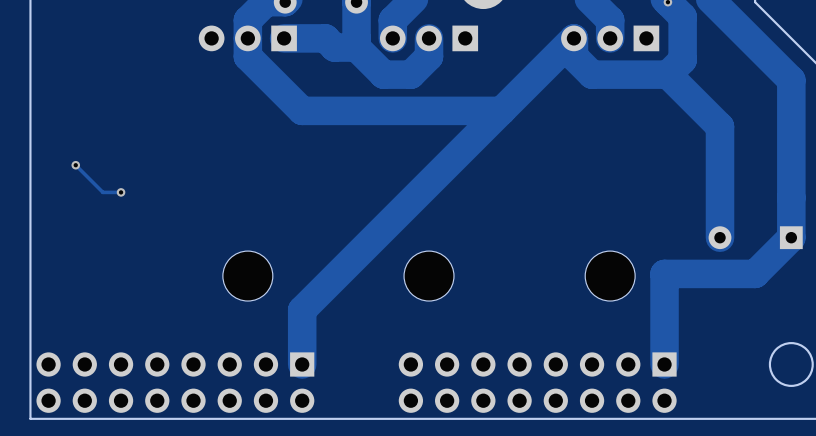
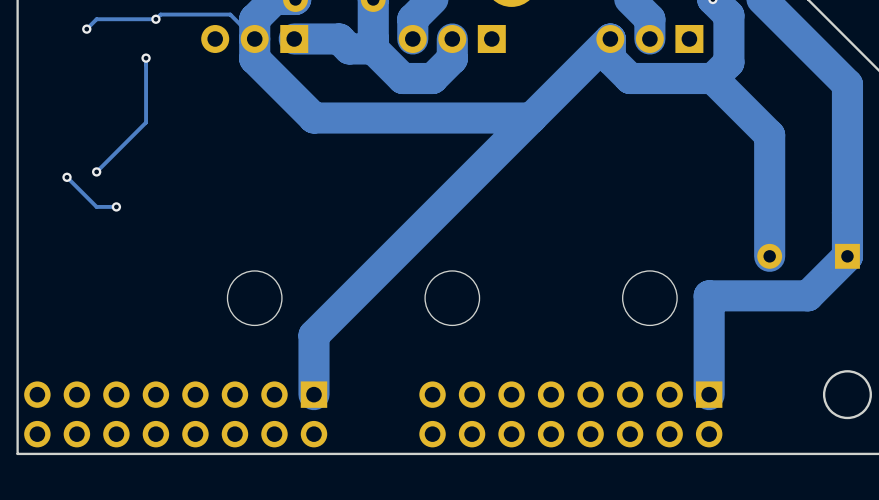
via: none -> (155, 19)
track: none -> (86, 29) (96, 19) (155, 19) (160, 14) (230, 14) (254, 38)
via: none -> (86, 29)
track: none -> (146, 58) (146, 122) (96, 171)
via: none -> (146, 58)
via: none -> (96, 171)

